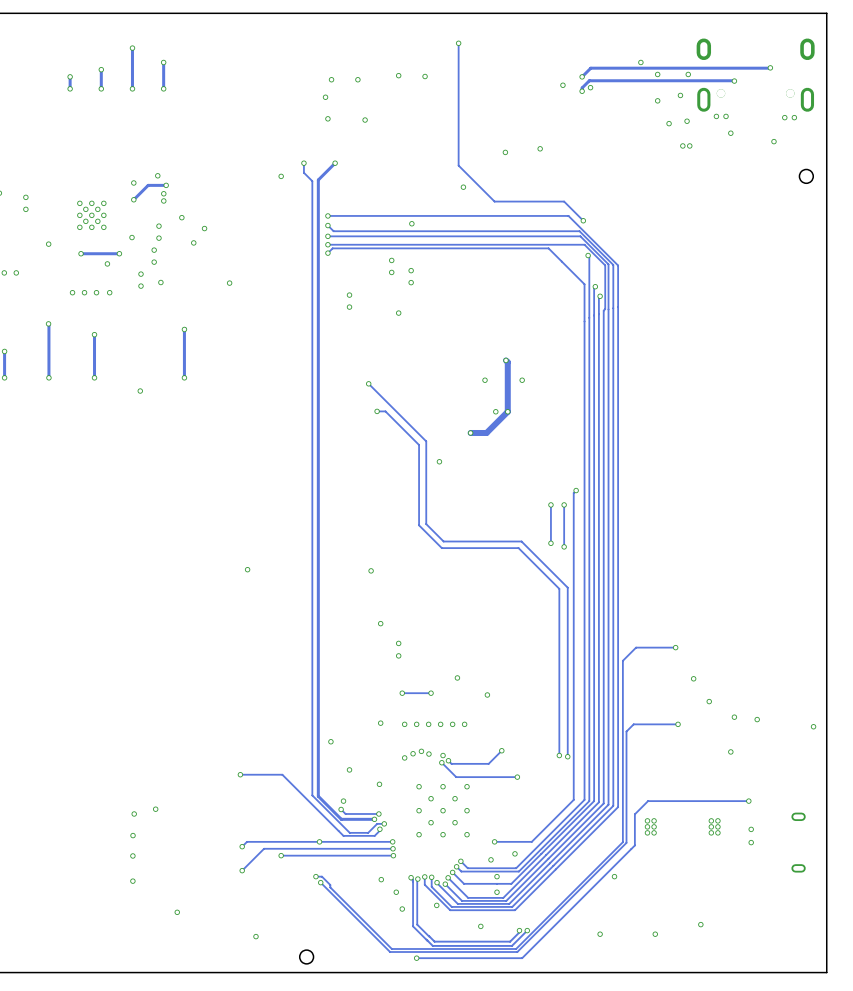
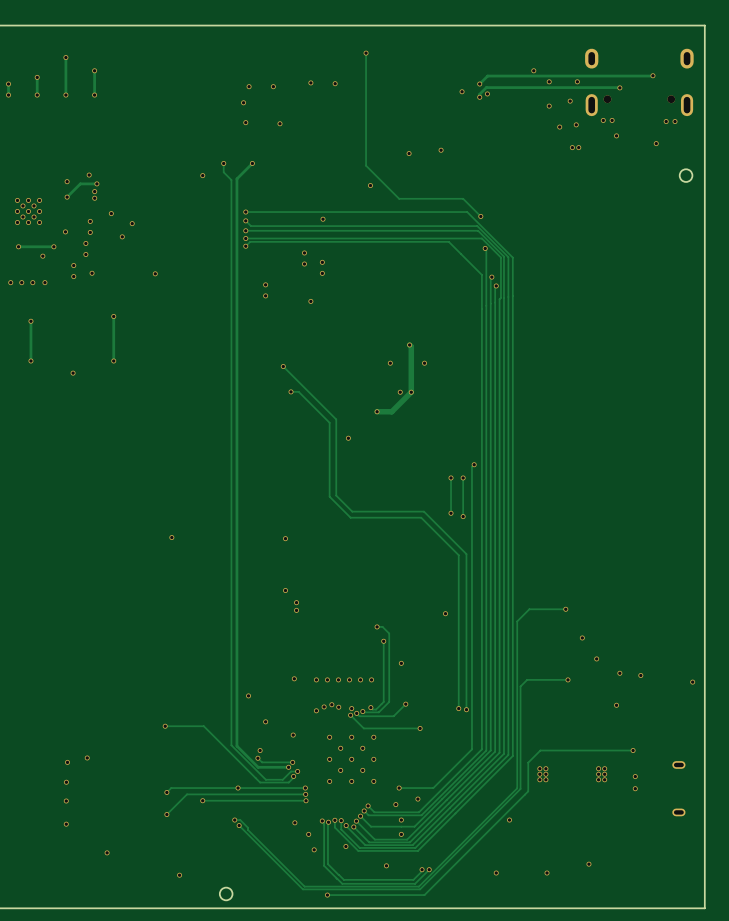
via: (380, 623) -> none
via: none -> (285, 590)
via: none -> (296, 602)
via: (398, 643) -> none
via: none -> (296, 610)
via: none -> (445, 613)
via: (398, 655) -> none
track: none -> (377, 626) (382, 626) (389, 633) (389, 701) (378, 712) (362, 711)
via: none -> (377, 626)
via: (457, 677) -> none
track: none -> (383, 641) (383, 701) (376, 709) (370, 707)
via: none -> (383, 641)
via: (402, 693) -> none
track: (431, 693) (402, 693) -> none
via: (431, 693) -> none
via: (487, 694) -> none
via: none -> (401, 663)
via: none -> (370, 707)
via: none -> (362, 711)

